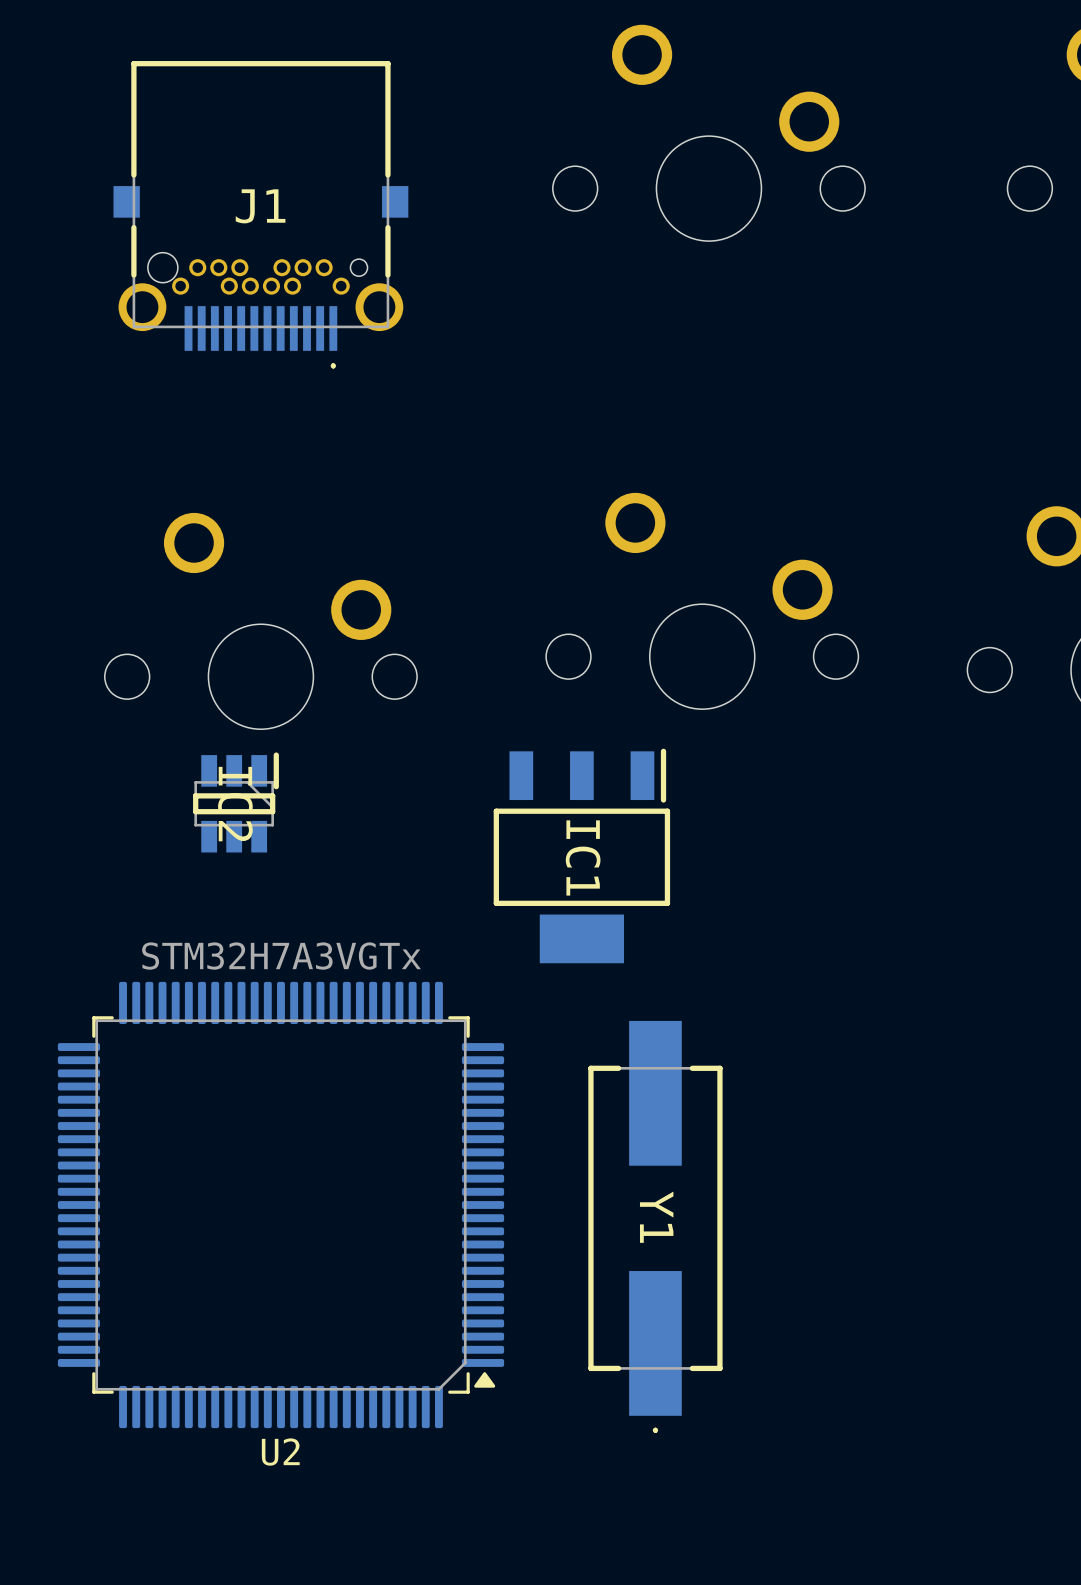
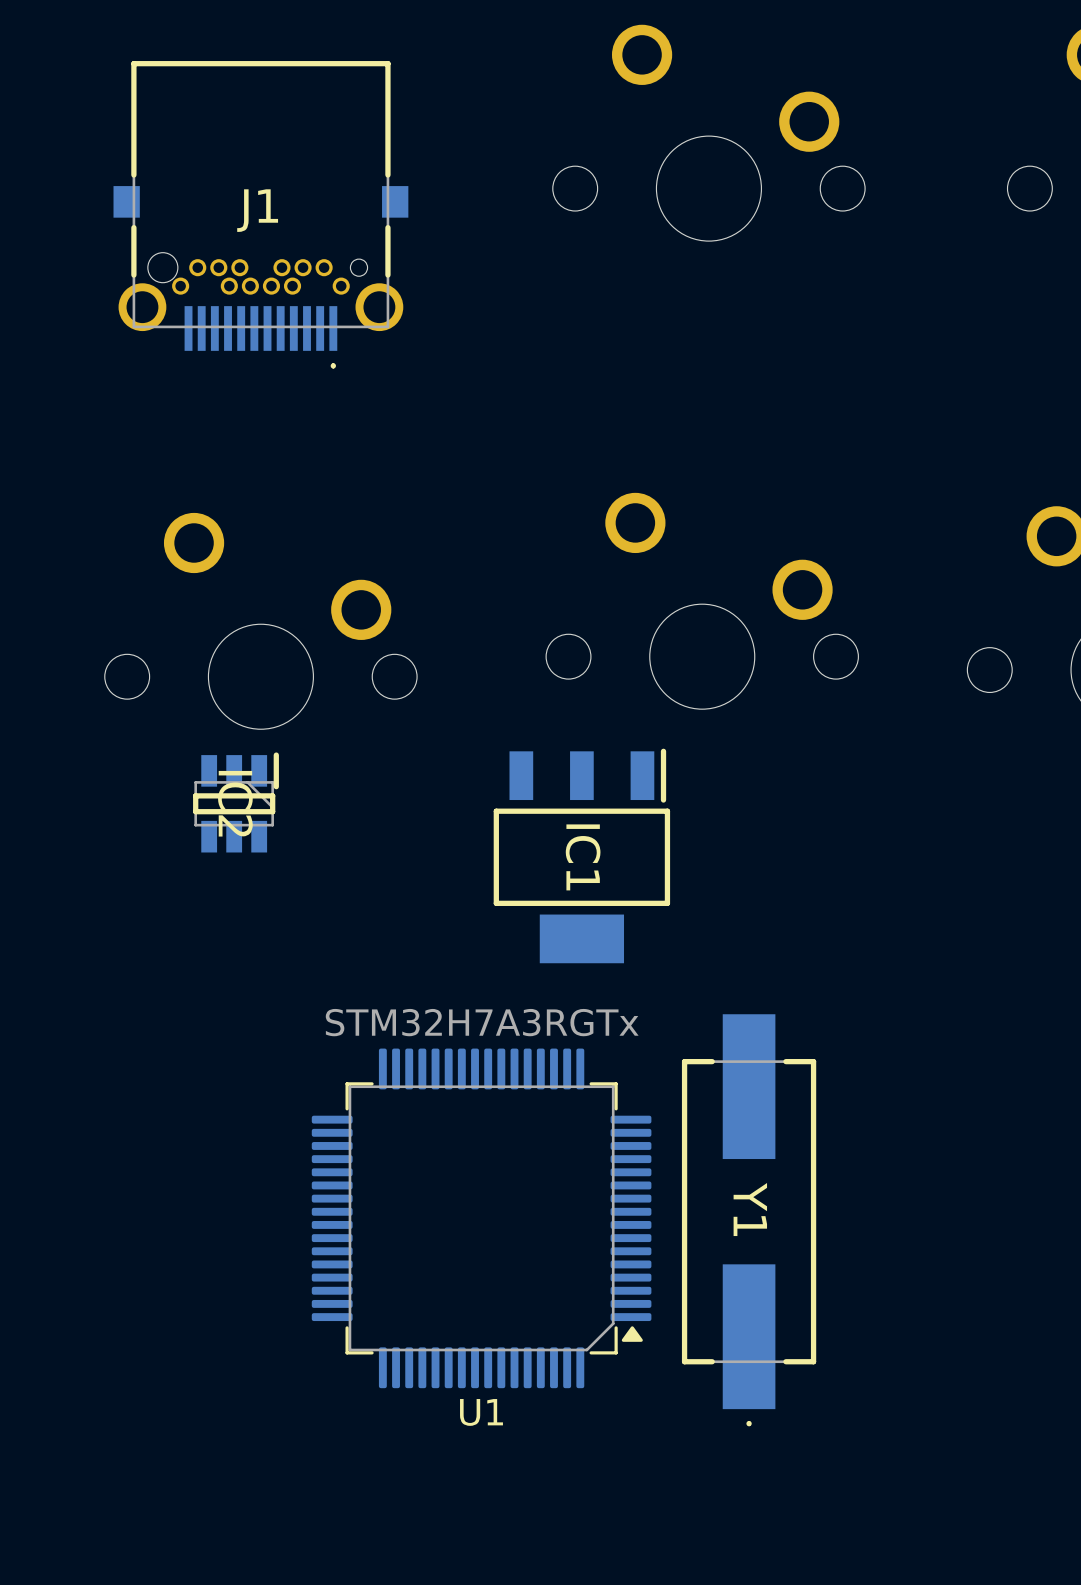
U2: STM32H7A3VGTx (280, 1204) -> none
U1: none -> STM32H7A3RGTx (481, 1218)
Y1 position: (655, 1226) -> (749, 1220)

